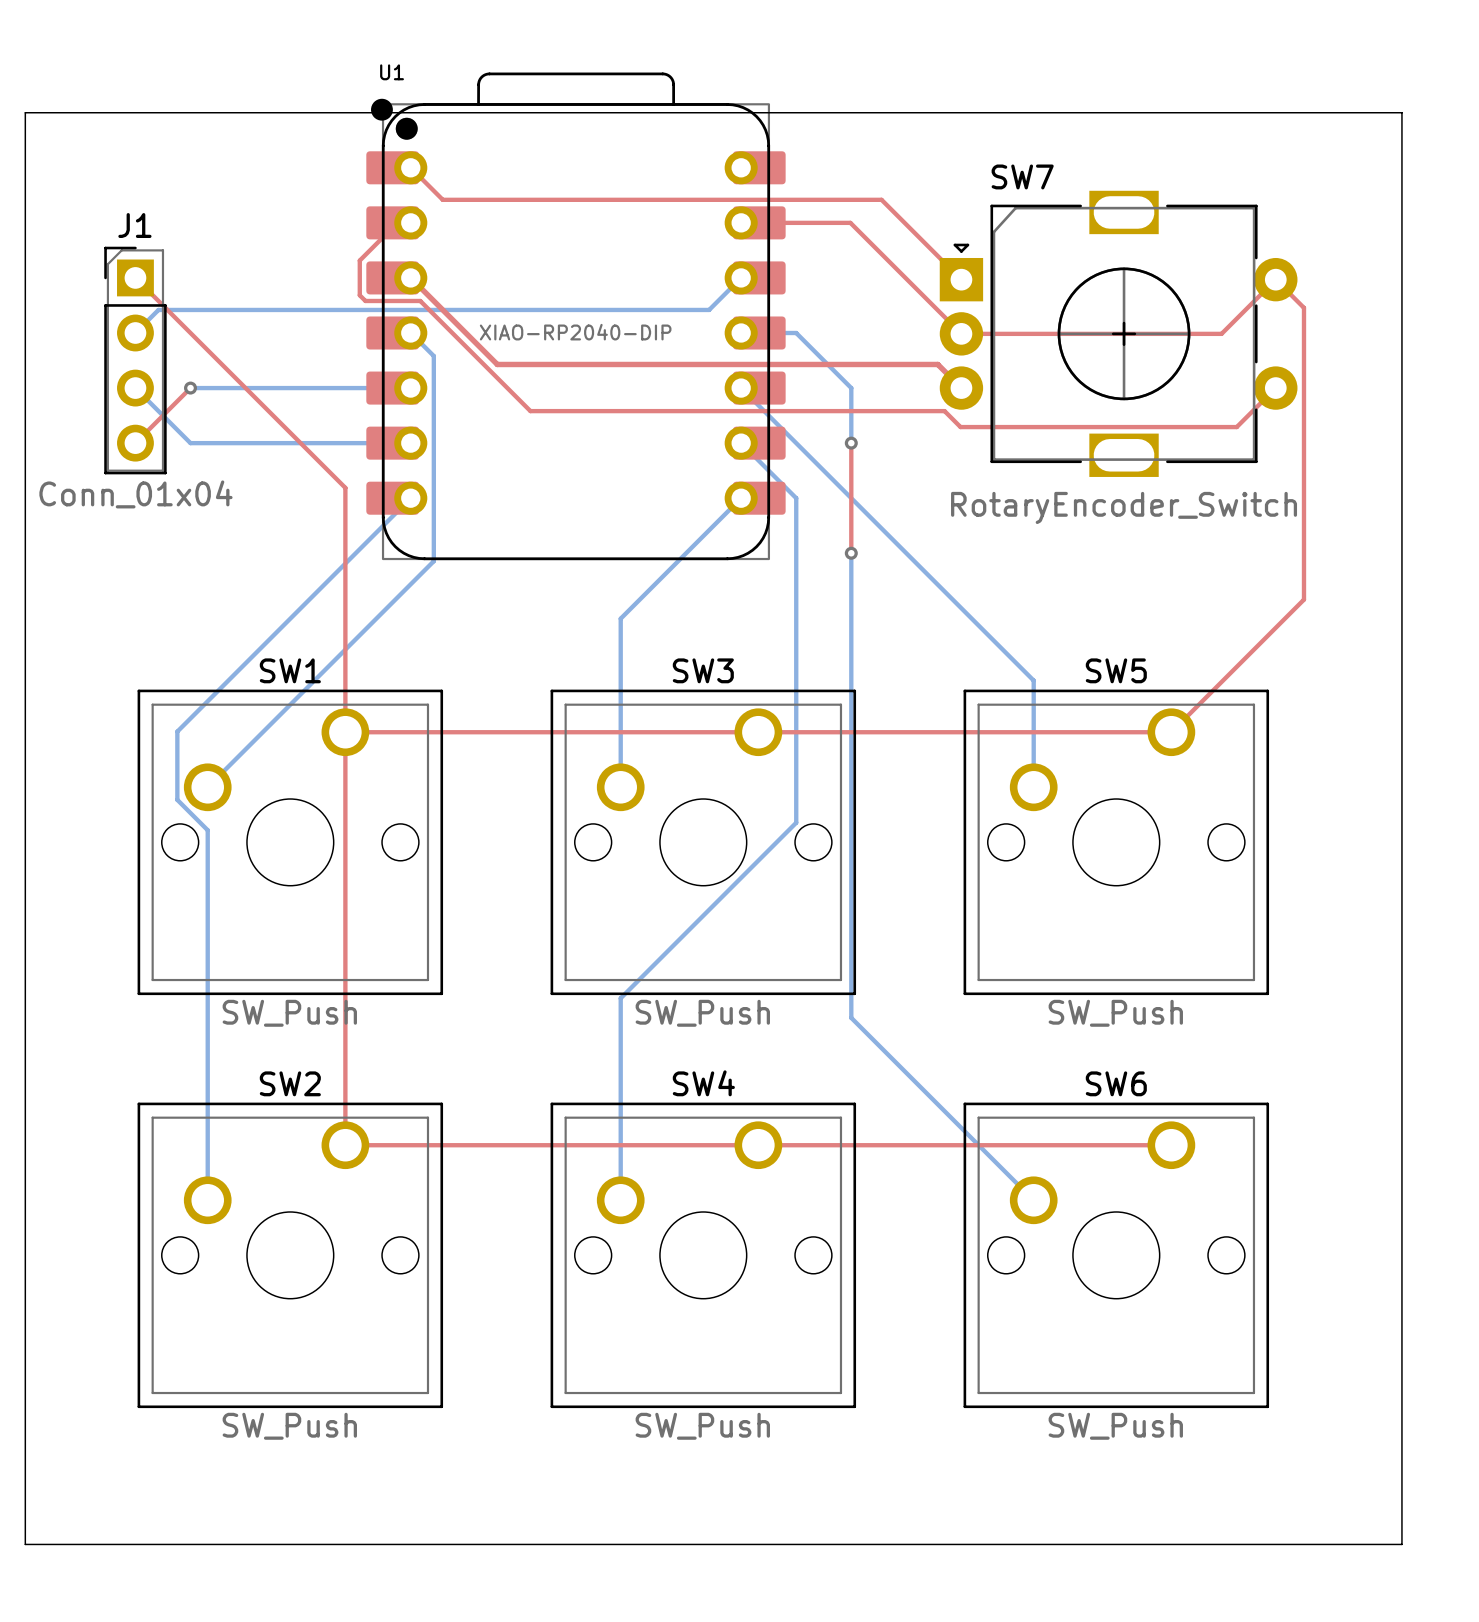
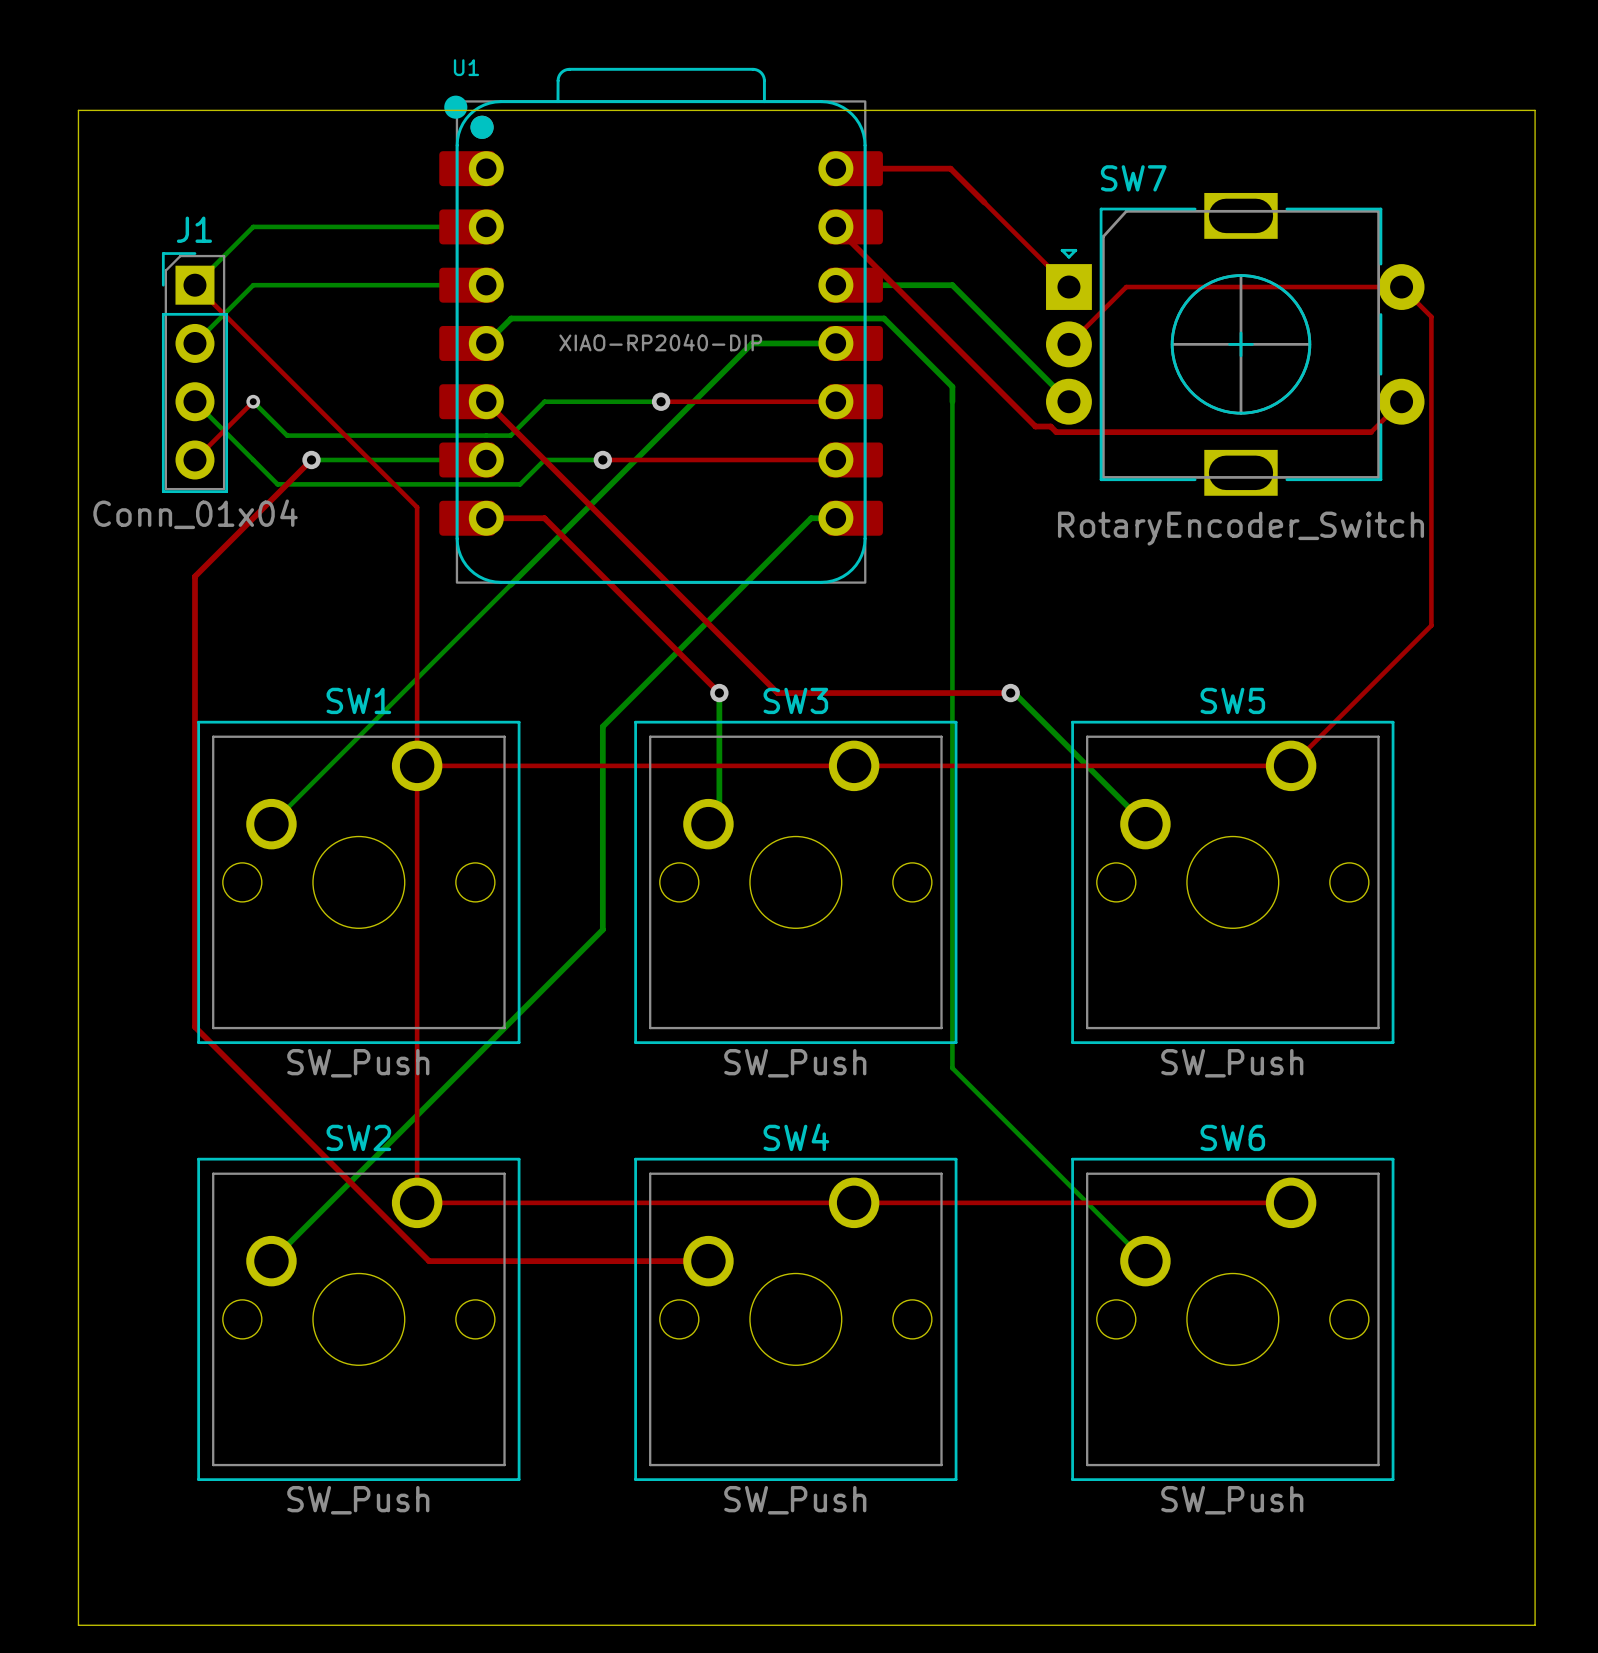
top track: (410, 167) (442, 199) (881, 199) -> (835, 168) (950, 168) (984, 202)
top track: (397, 222) (359, 260) (359, 295) (365, 300) (420, 300) (530, 411) (944, 411) (960, 427) (1236, 427) (1247, 416) -> none
bottom track: none -> (486, 226) (253, 226) (194, 285)
top track: (741, 222) (850, 222) (961, 333) (1221, 333) (1275, 279) -> (835, 226) (1035, 426) (1050, 426) (1056, 432) (1371, 432)
top track: (410, 277) (497, 364) (937, 364) (961, 388) (938, 365) -> none
bottom track: (741, 277) (709, 309) (158, 309) -> (486, 285) (253, 285) (219, 319)
bottom track: none -> (855, 285) (952, 285) (1068, 401)
top track: none -> (1401, 287) (1126, 287) (1068, 344)
bottom track: (410, 333) (433, 356) (433, 561) -> (835, 343) (752, 343) (510, 584)
bottom track: (741, 333) (796, 333) (851, 388) -> (486, 343) (511, 318) (884, 318) (952, 386) (952, 401)
bottom track: (190, 388) (410, 388) -> (253, 401) (287, 435) (510, 435) (544, 401) (661, 401)
top track: none -> (486, 401) (777, 693) (1010, 693)
top track: none -> (661, 401) (835, 401)
via: none -> (661, 401)
bottom track: (741, 388) (1033, 680) (1033, 787) -> (1010, 693) (1014, 693) (1145, 824)
bottom track: (190, 443) (245, 443) -> (253, 459) (277, 484) (520, 484) (544, 459) (602, 459)
top track: none -> (311, 459) (194, 576) (194, 1026) (429, 1261) (708, 1261)
via: none -> (311, 459)
top track: none -> (602, 459) (835, 459)
via: none -> (602, 459)
bottom track: (741, 443) (796, 498) (796, 822) (620, 998) (620, 1200) -> none
bottom track: none -> (952, 459) (952, 576)
top track: (851, 443) (851, 553) -> none
via: (851, 443) -> none
bottom track: (410, 498) (177, 731) (177, 799) (207, 830) (207, 1200) -> (835, 518) (811, 518) (602, 726) (602, 929) (271, 1261)
top track: none -> (486, 518) (544, 518) (719, 693)
bottom track: (741, 498) (620, 618) (620, 787) -> (719, 693) (719, 813) (708, 824)
via: (851, 553) -> none
via: none -> (719, 693)
via: none -> (1010, 693)

